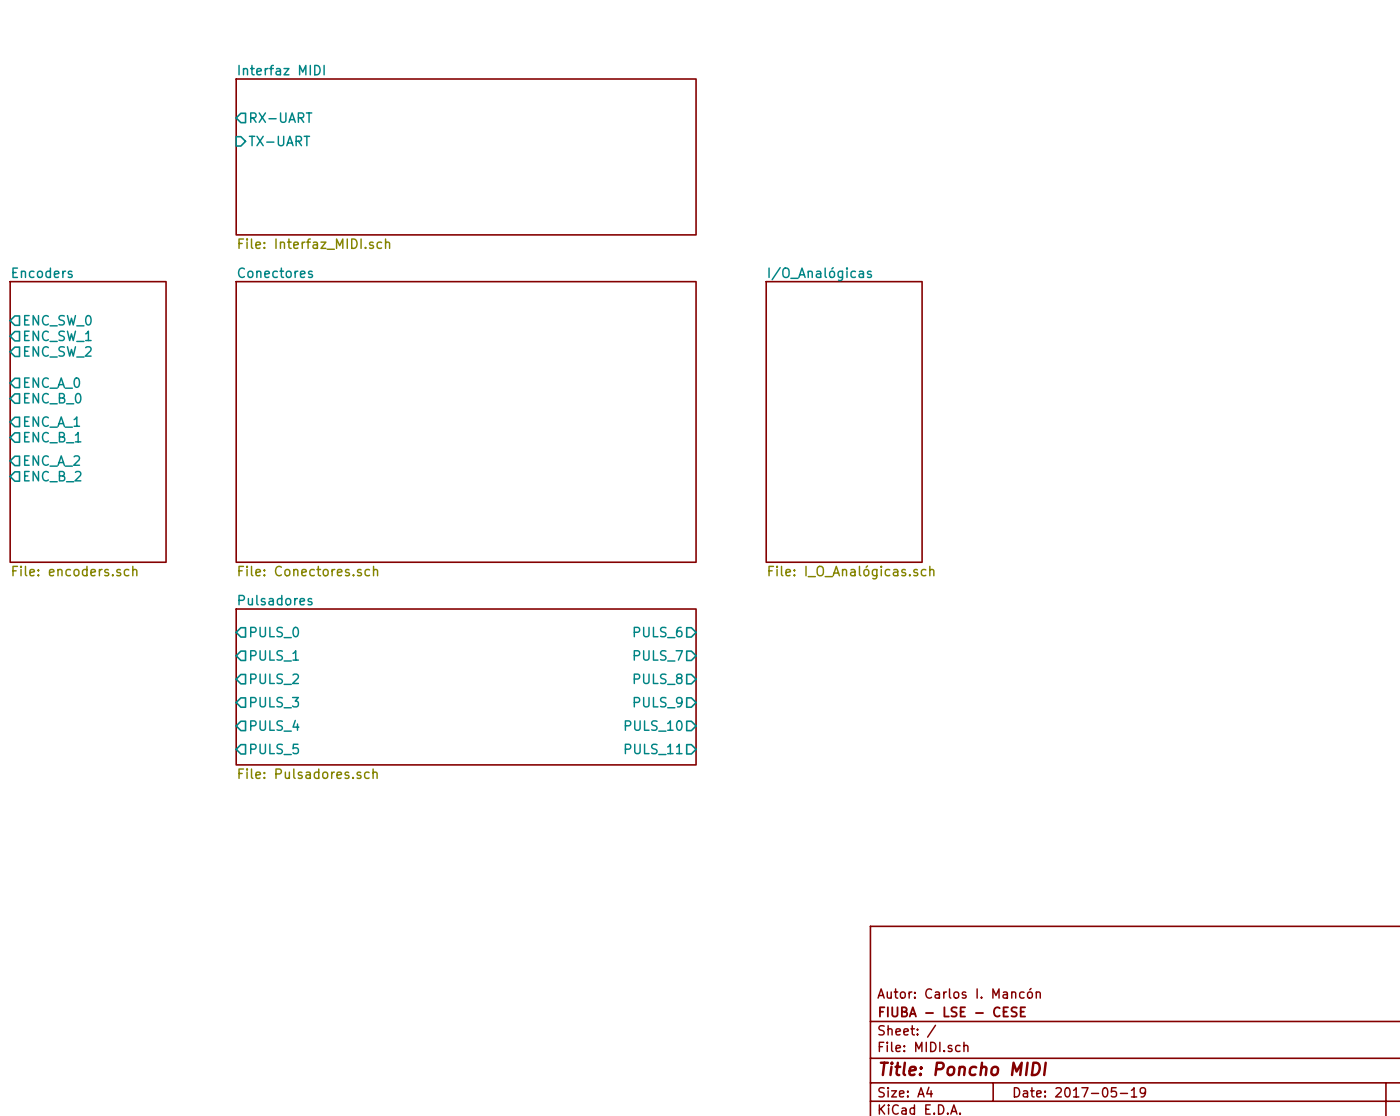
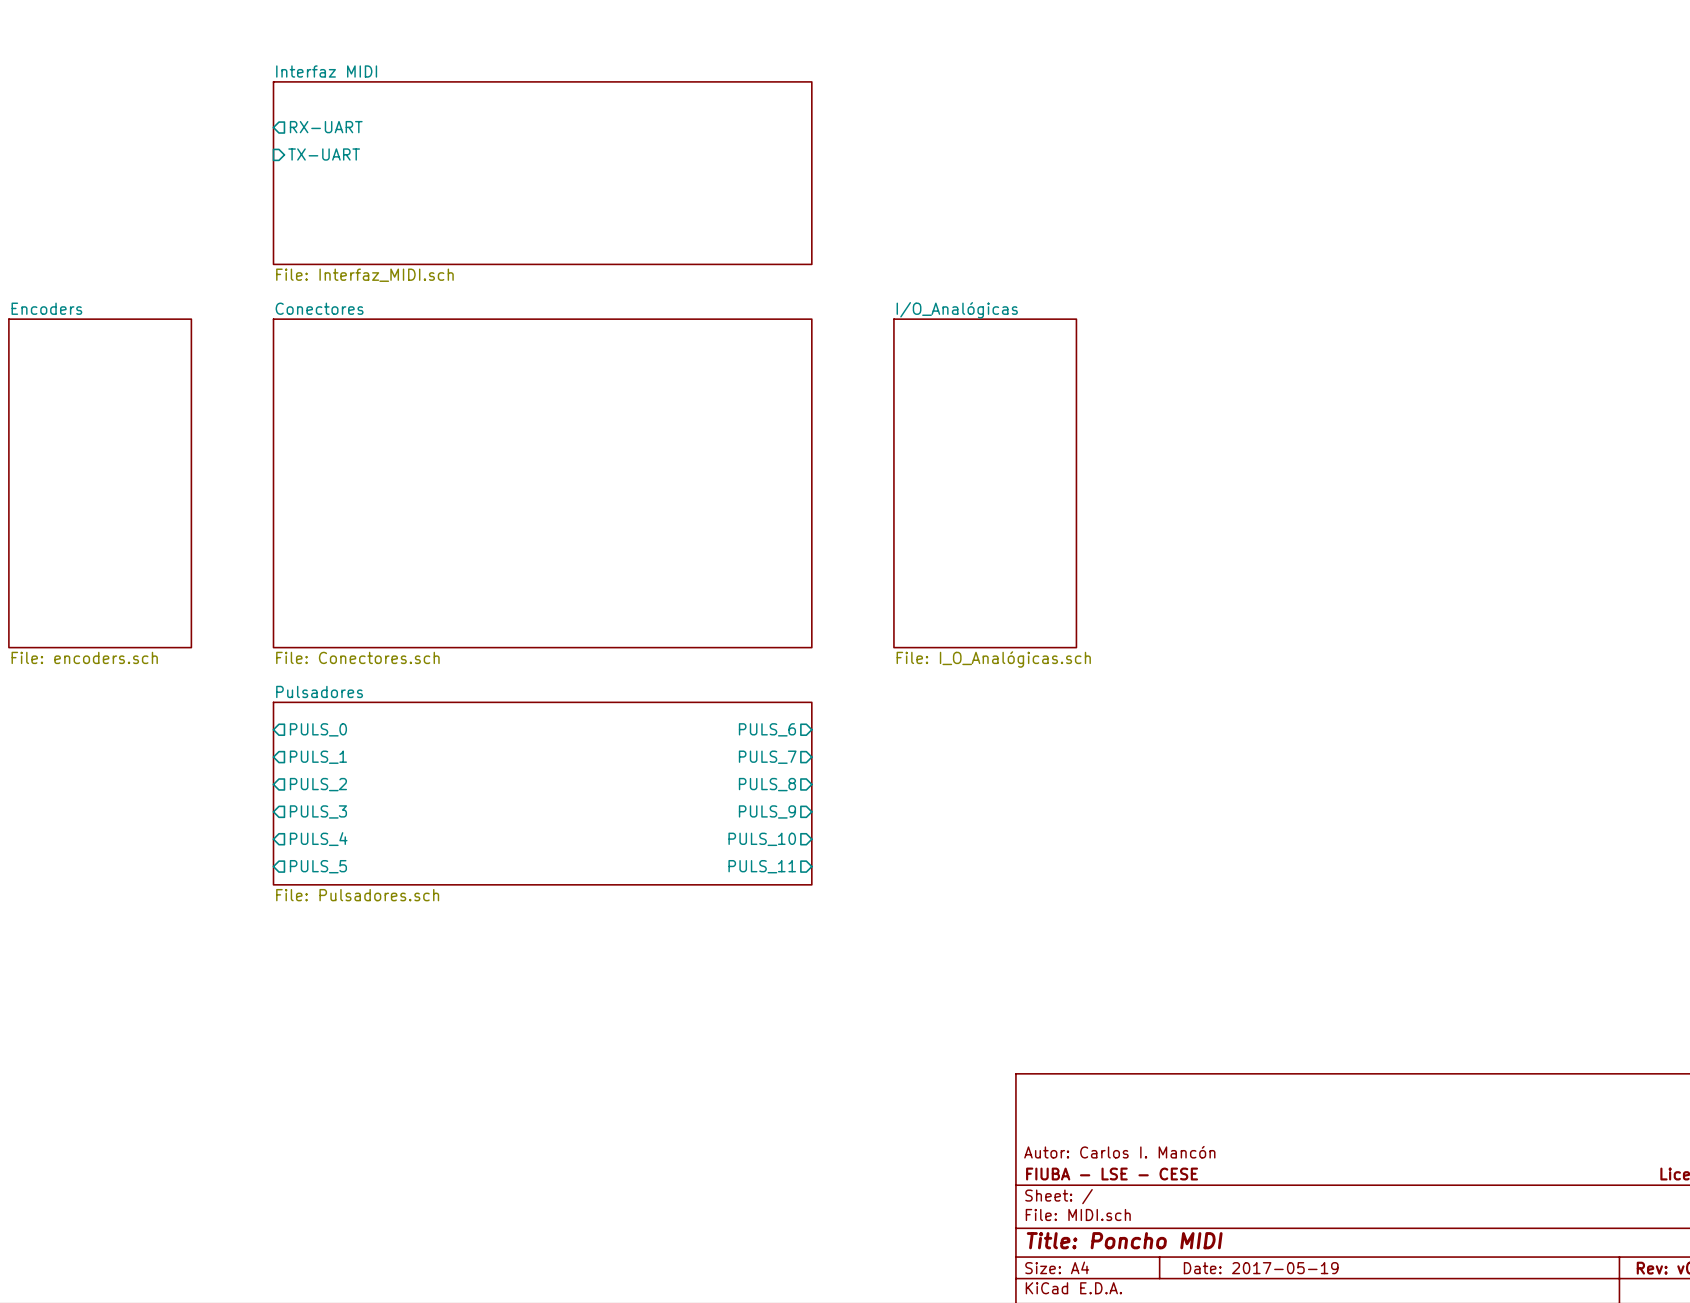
sheet pin: ENC_SW_0 (57, 320) -> none
sheet pin: ENC_SW_1 (57, 336) -> none
sheet pin: ENC_SW_2 (57, 351) -> none
sheet pin: ENC_A_0 (52, 383) -> none
sheet pin: ENC_B_0 (52, 398) -> none
sheet pin: ENC_A_1 (52, 422) -> none
sheet pin: ENC_B_1 (52, 437) -> none
sheet pin: ENC_A_2 (52, 461) -> none
sheet pin: ENC_B_2 (52, 476) -> none

